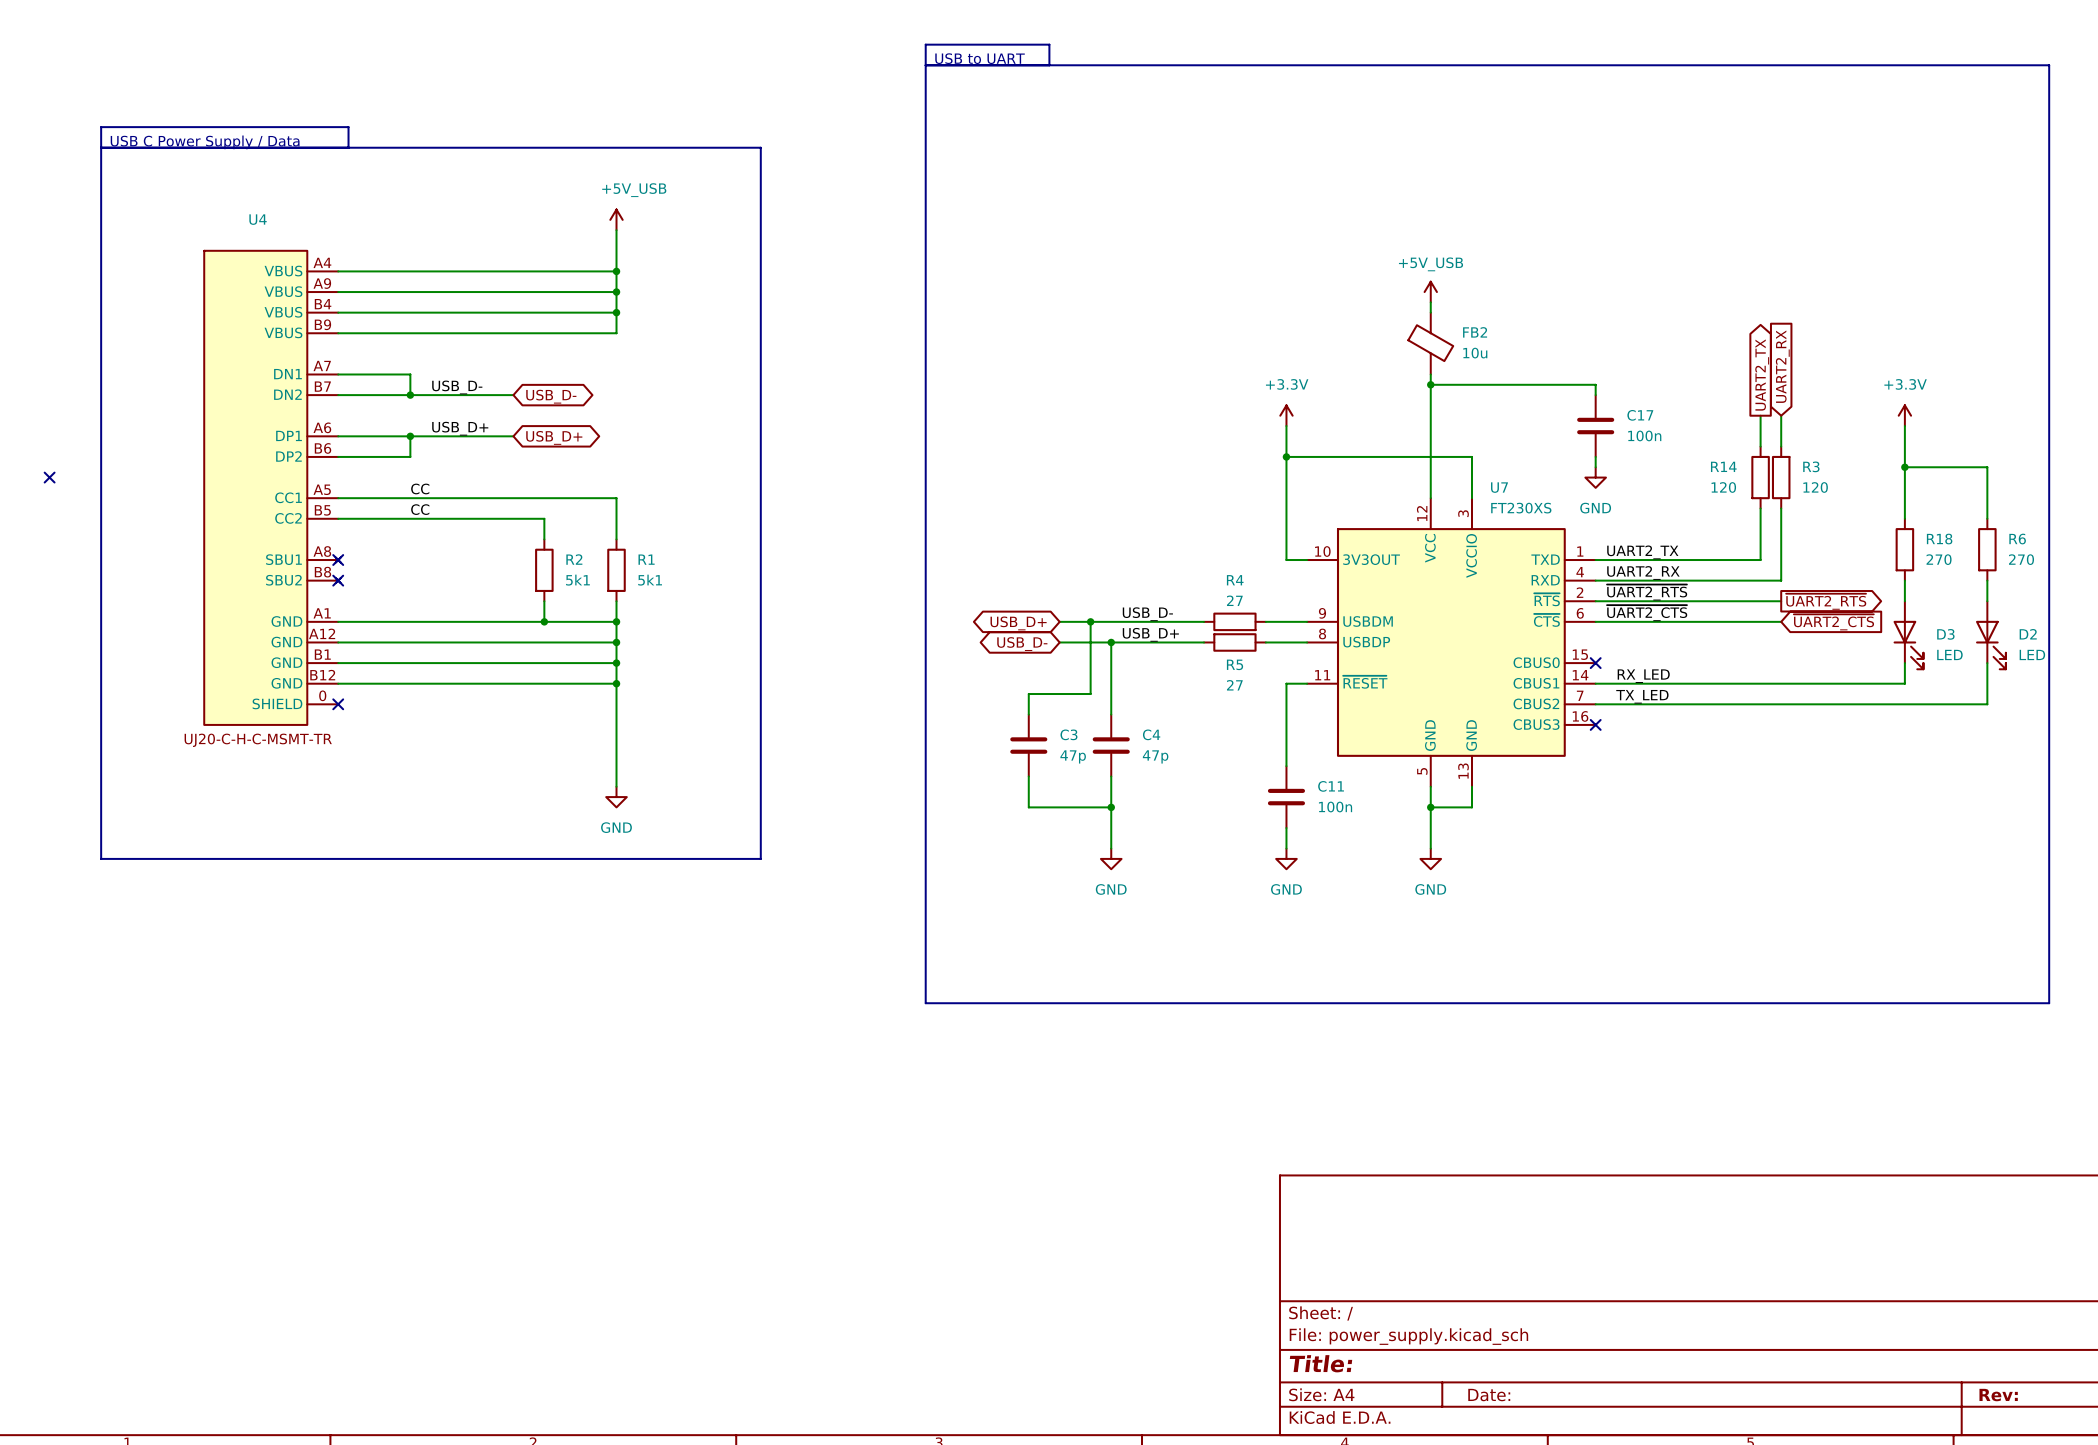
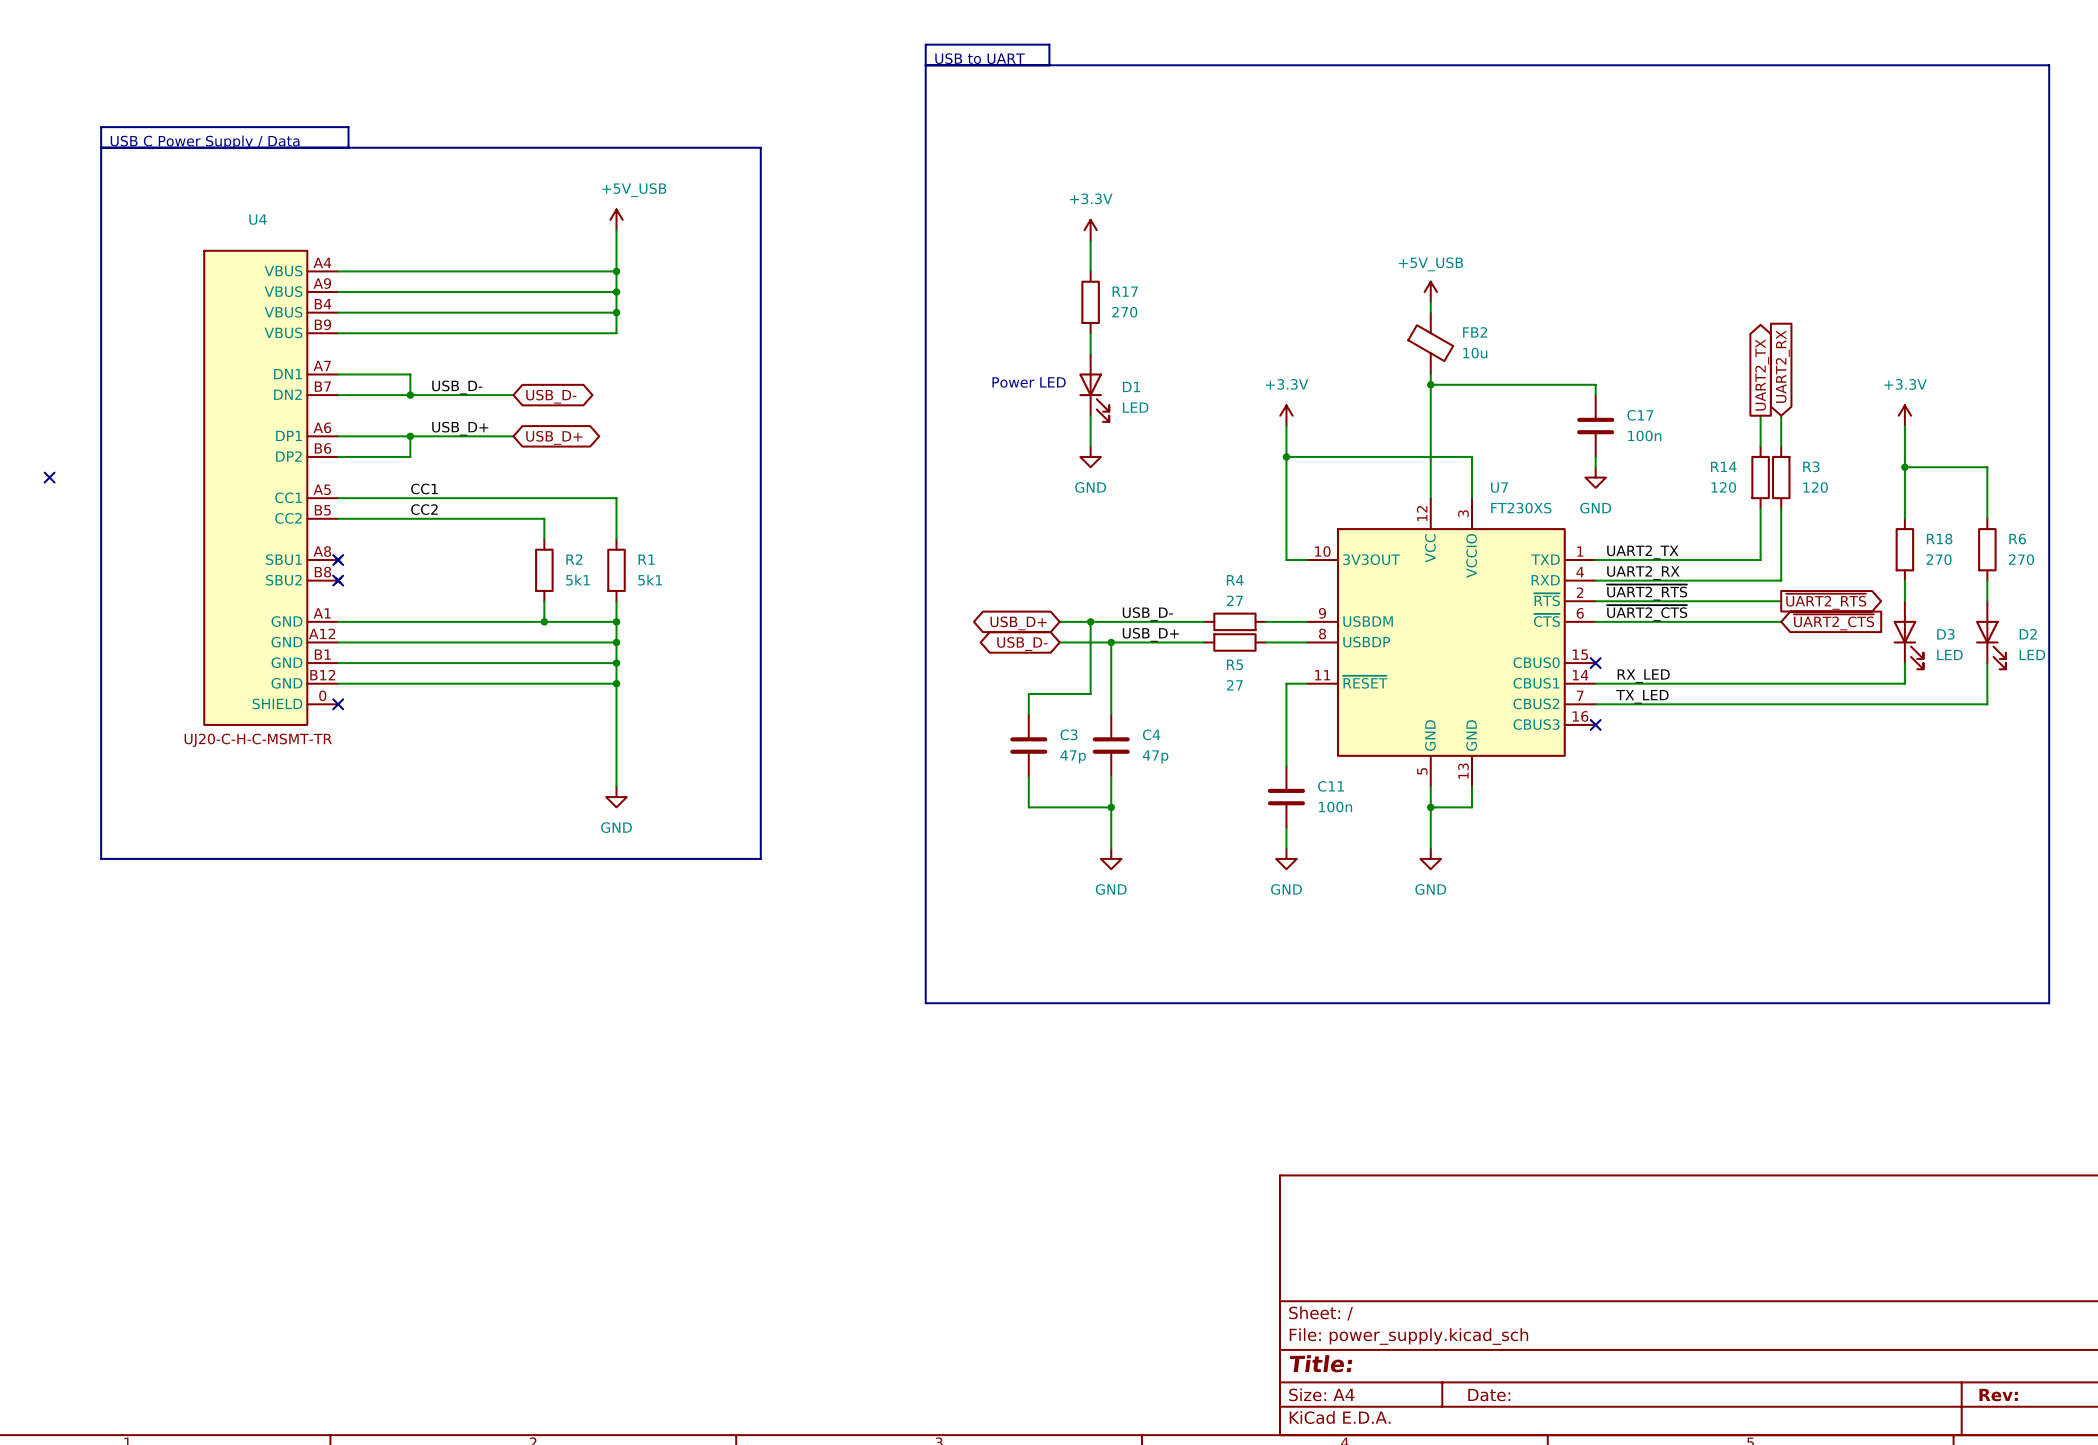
power symbol: none -> +3.3V (1090, 230)
wire: none -> (1090, 240) (1090, 271)
R17: none -> 270 (1090, 302)
wire: none -> (1090, 333) (1090, 353)
text: none -> Power LED (1029, 382)
D1: none -> LED (1094, 387)
wire: none -> (1090, 415) (1090, 446)
power symbol: none -> GND (1090, 456)
label: CC (420, 488) -> CC1 (424, 488)
label: CC (420, 509) -> CC2 (424, 509)

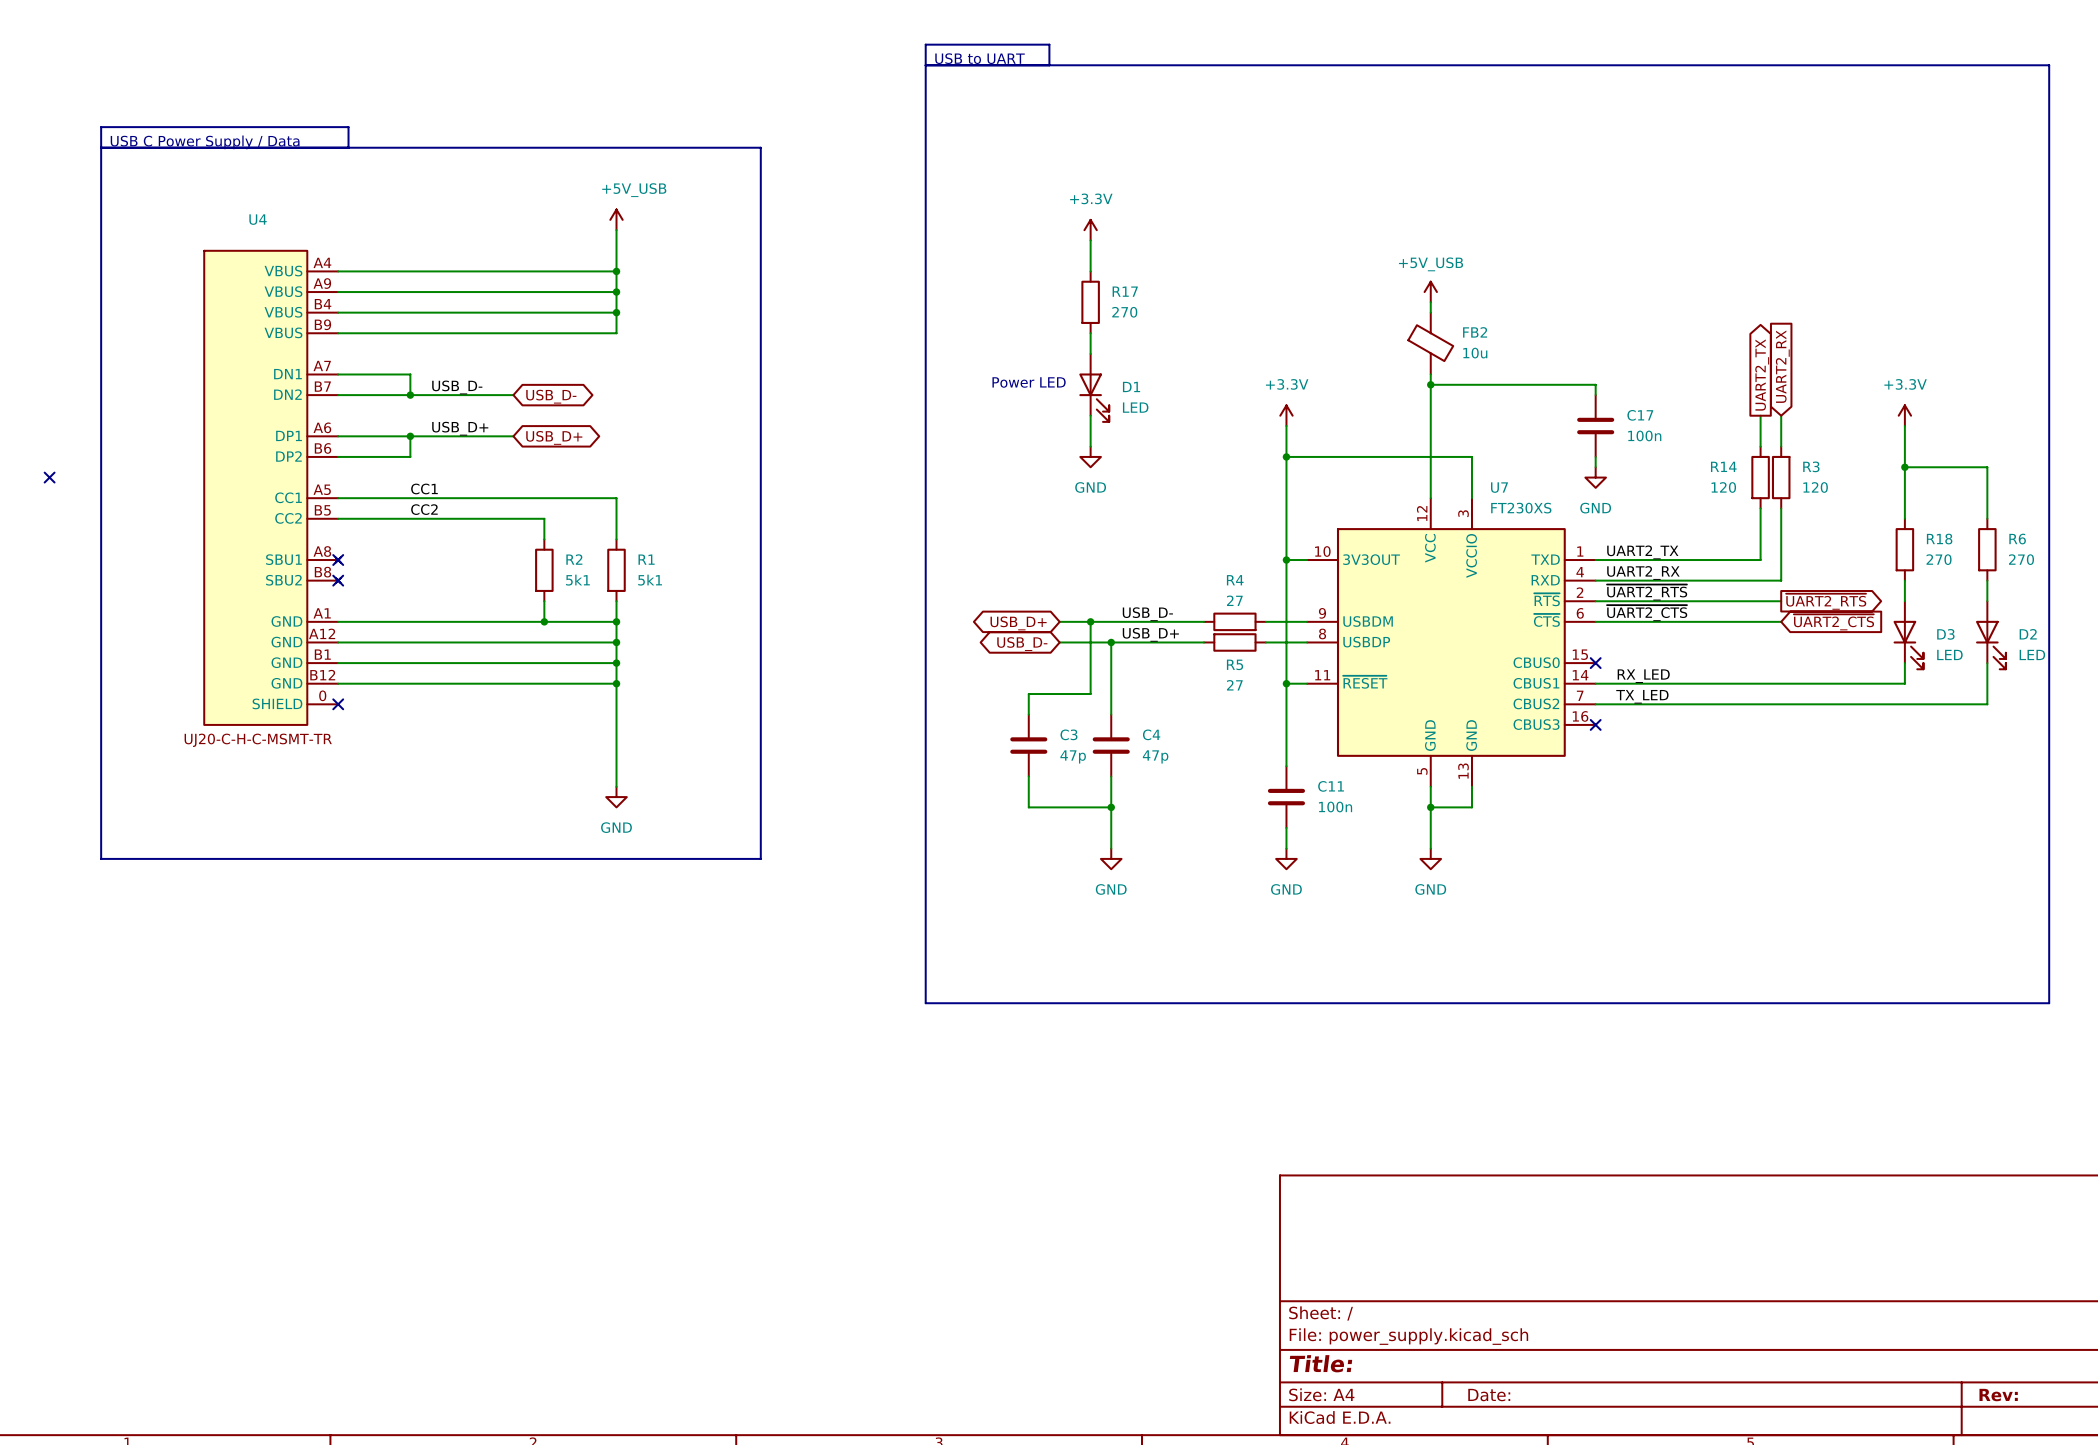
wire: none -> (1286, 560) (1286, 683)
junction: none -> (1286, 560)
junction: none -> (1286, 683)

